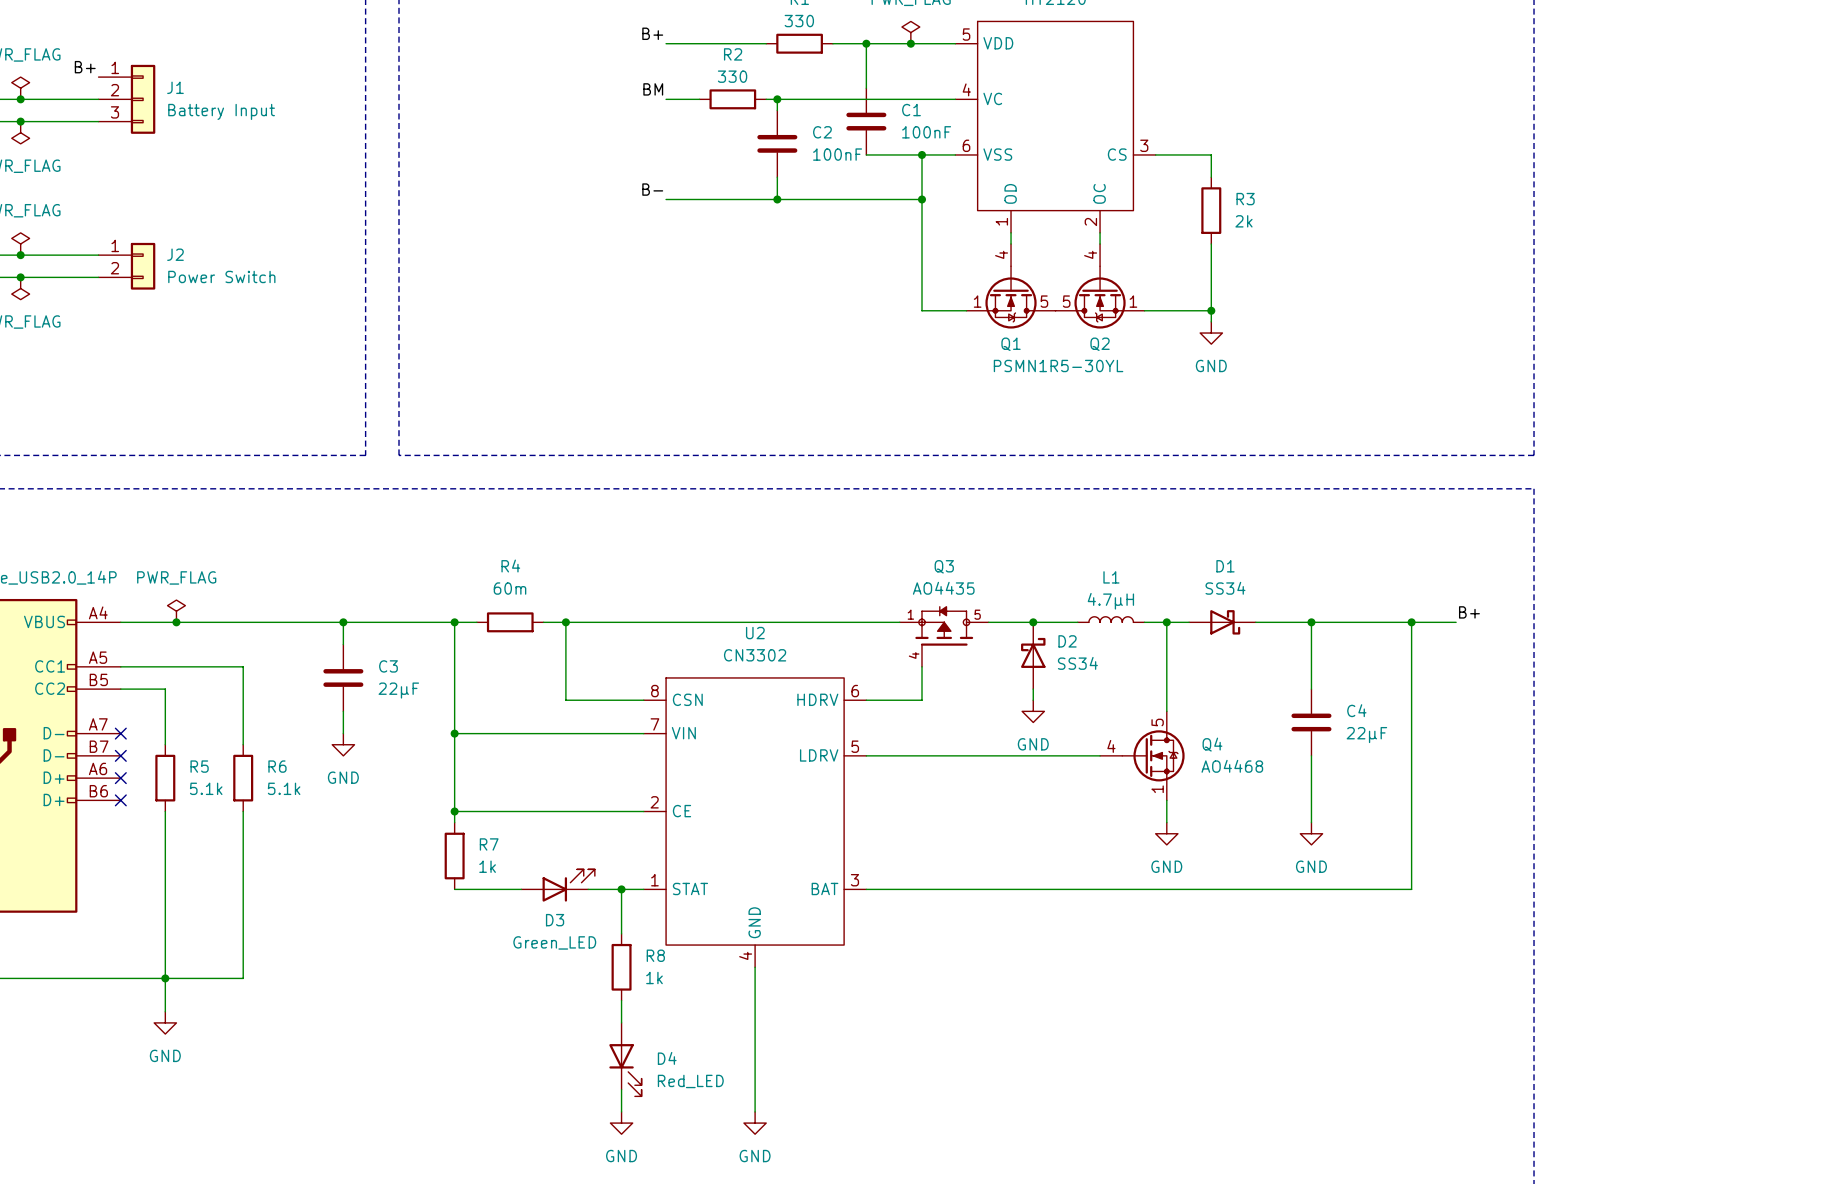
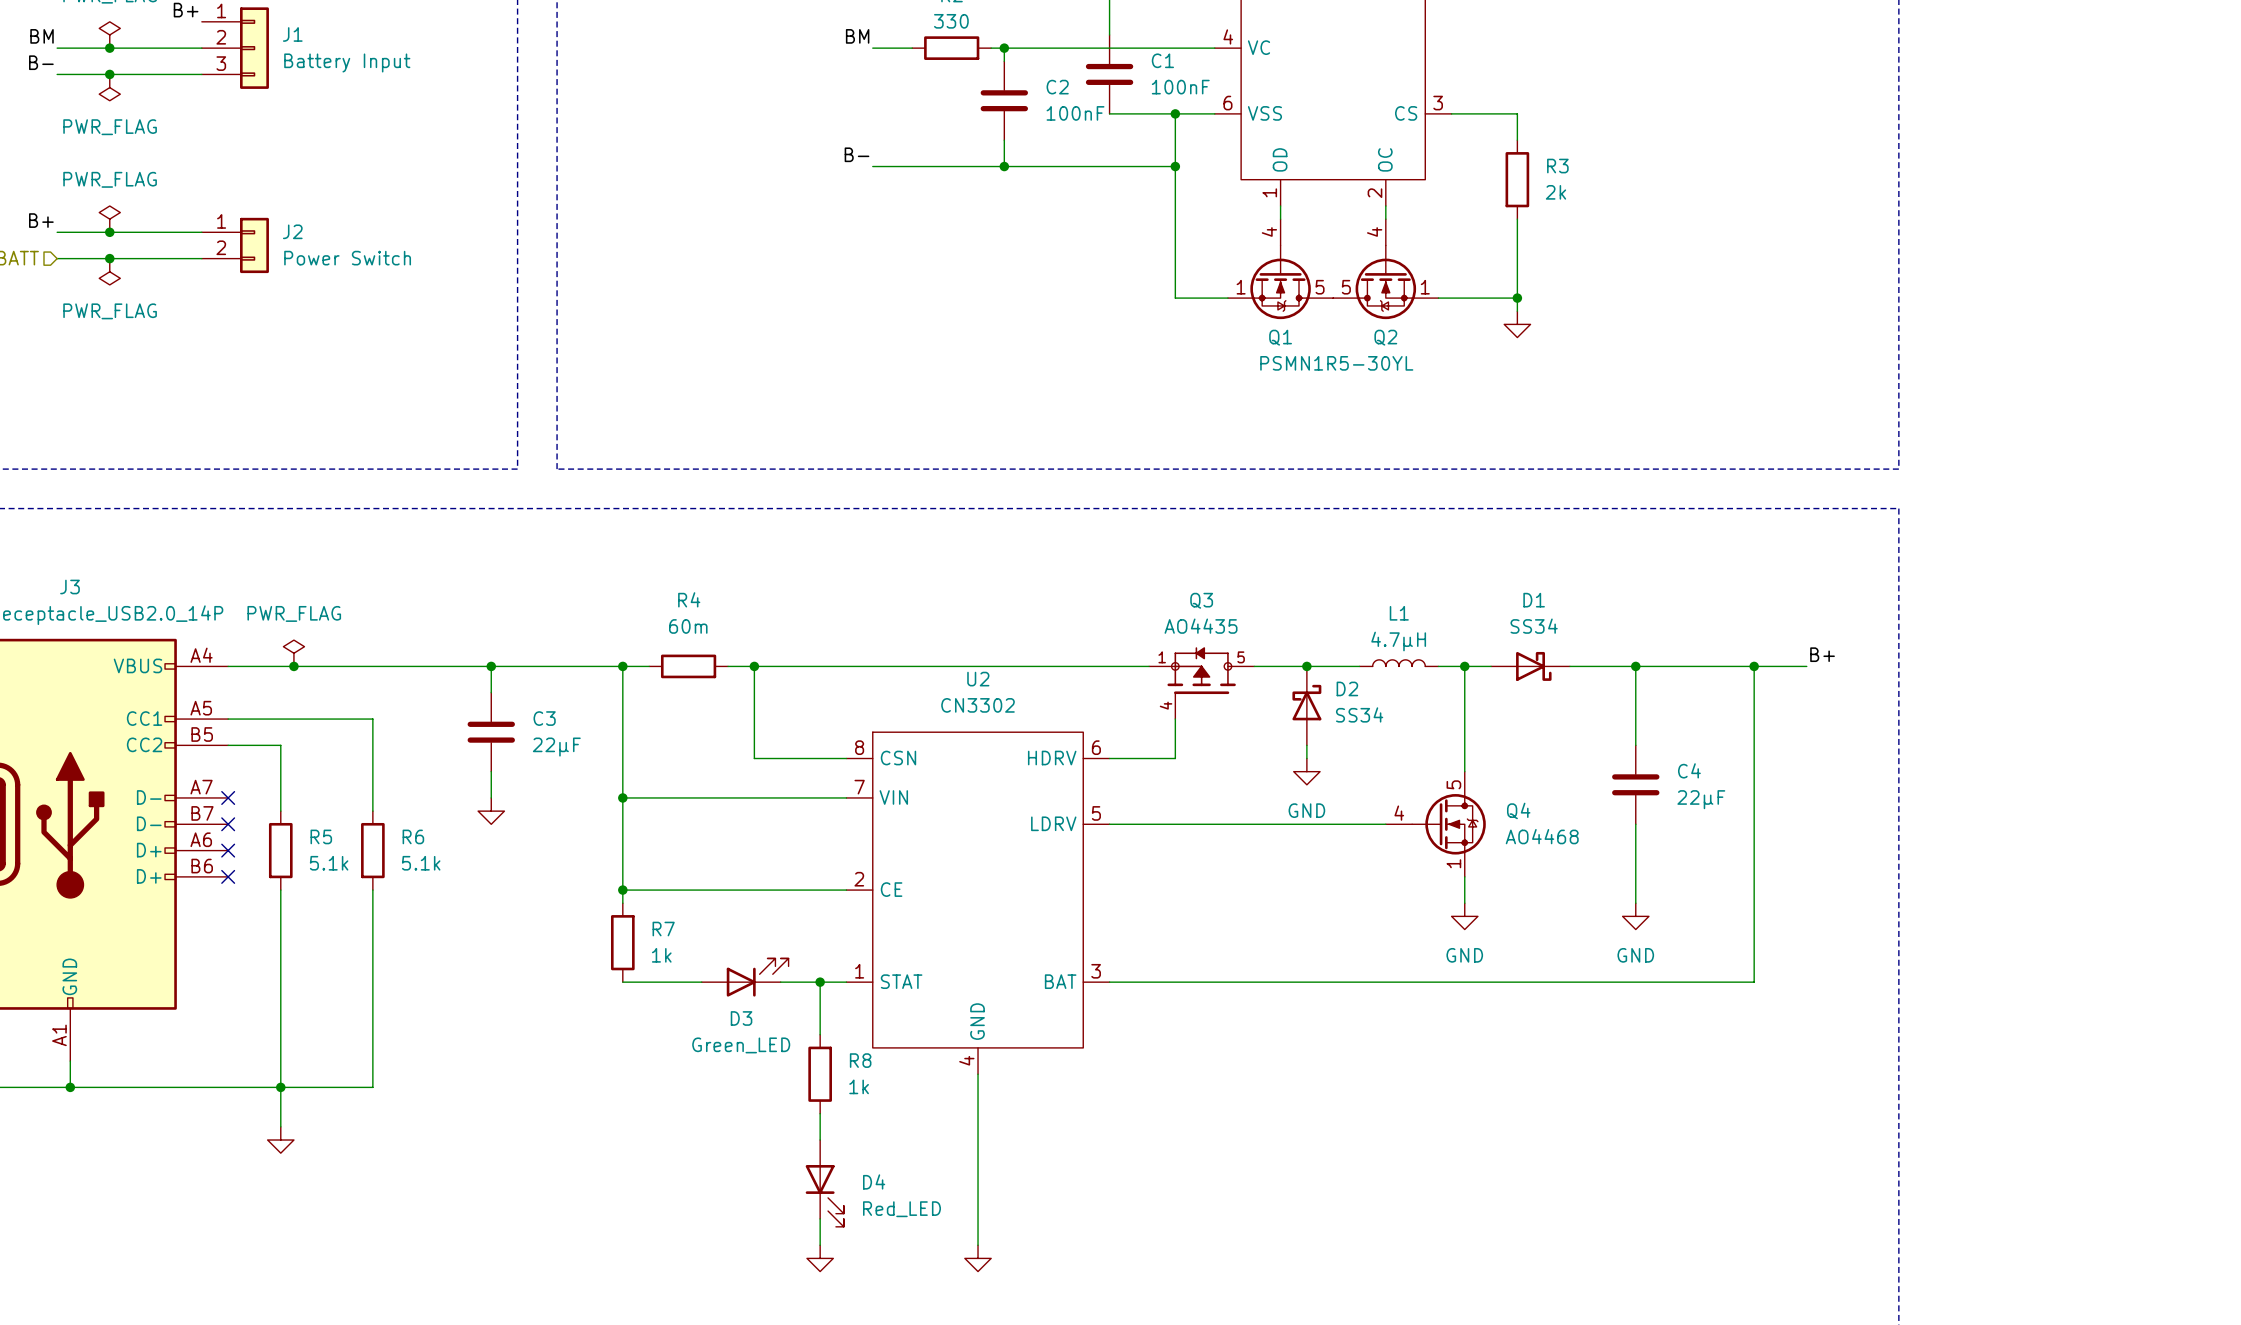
power symbol text: GND (1211, 365) -> none
power symbol text: GND (343, 777) -> none
power symbol text: GND (165, 1055) -> none
power symbol text: GND (621, 1156) -> none
power symbol text: GND (755, 1156) -> none

